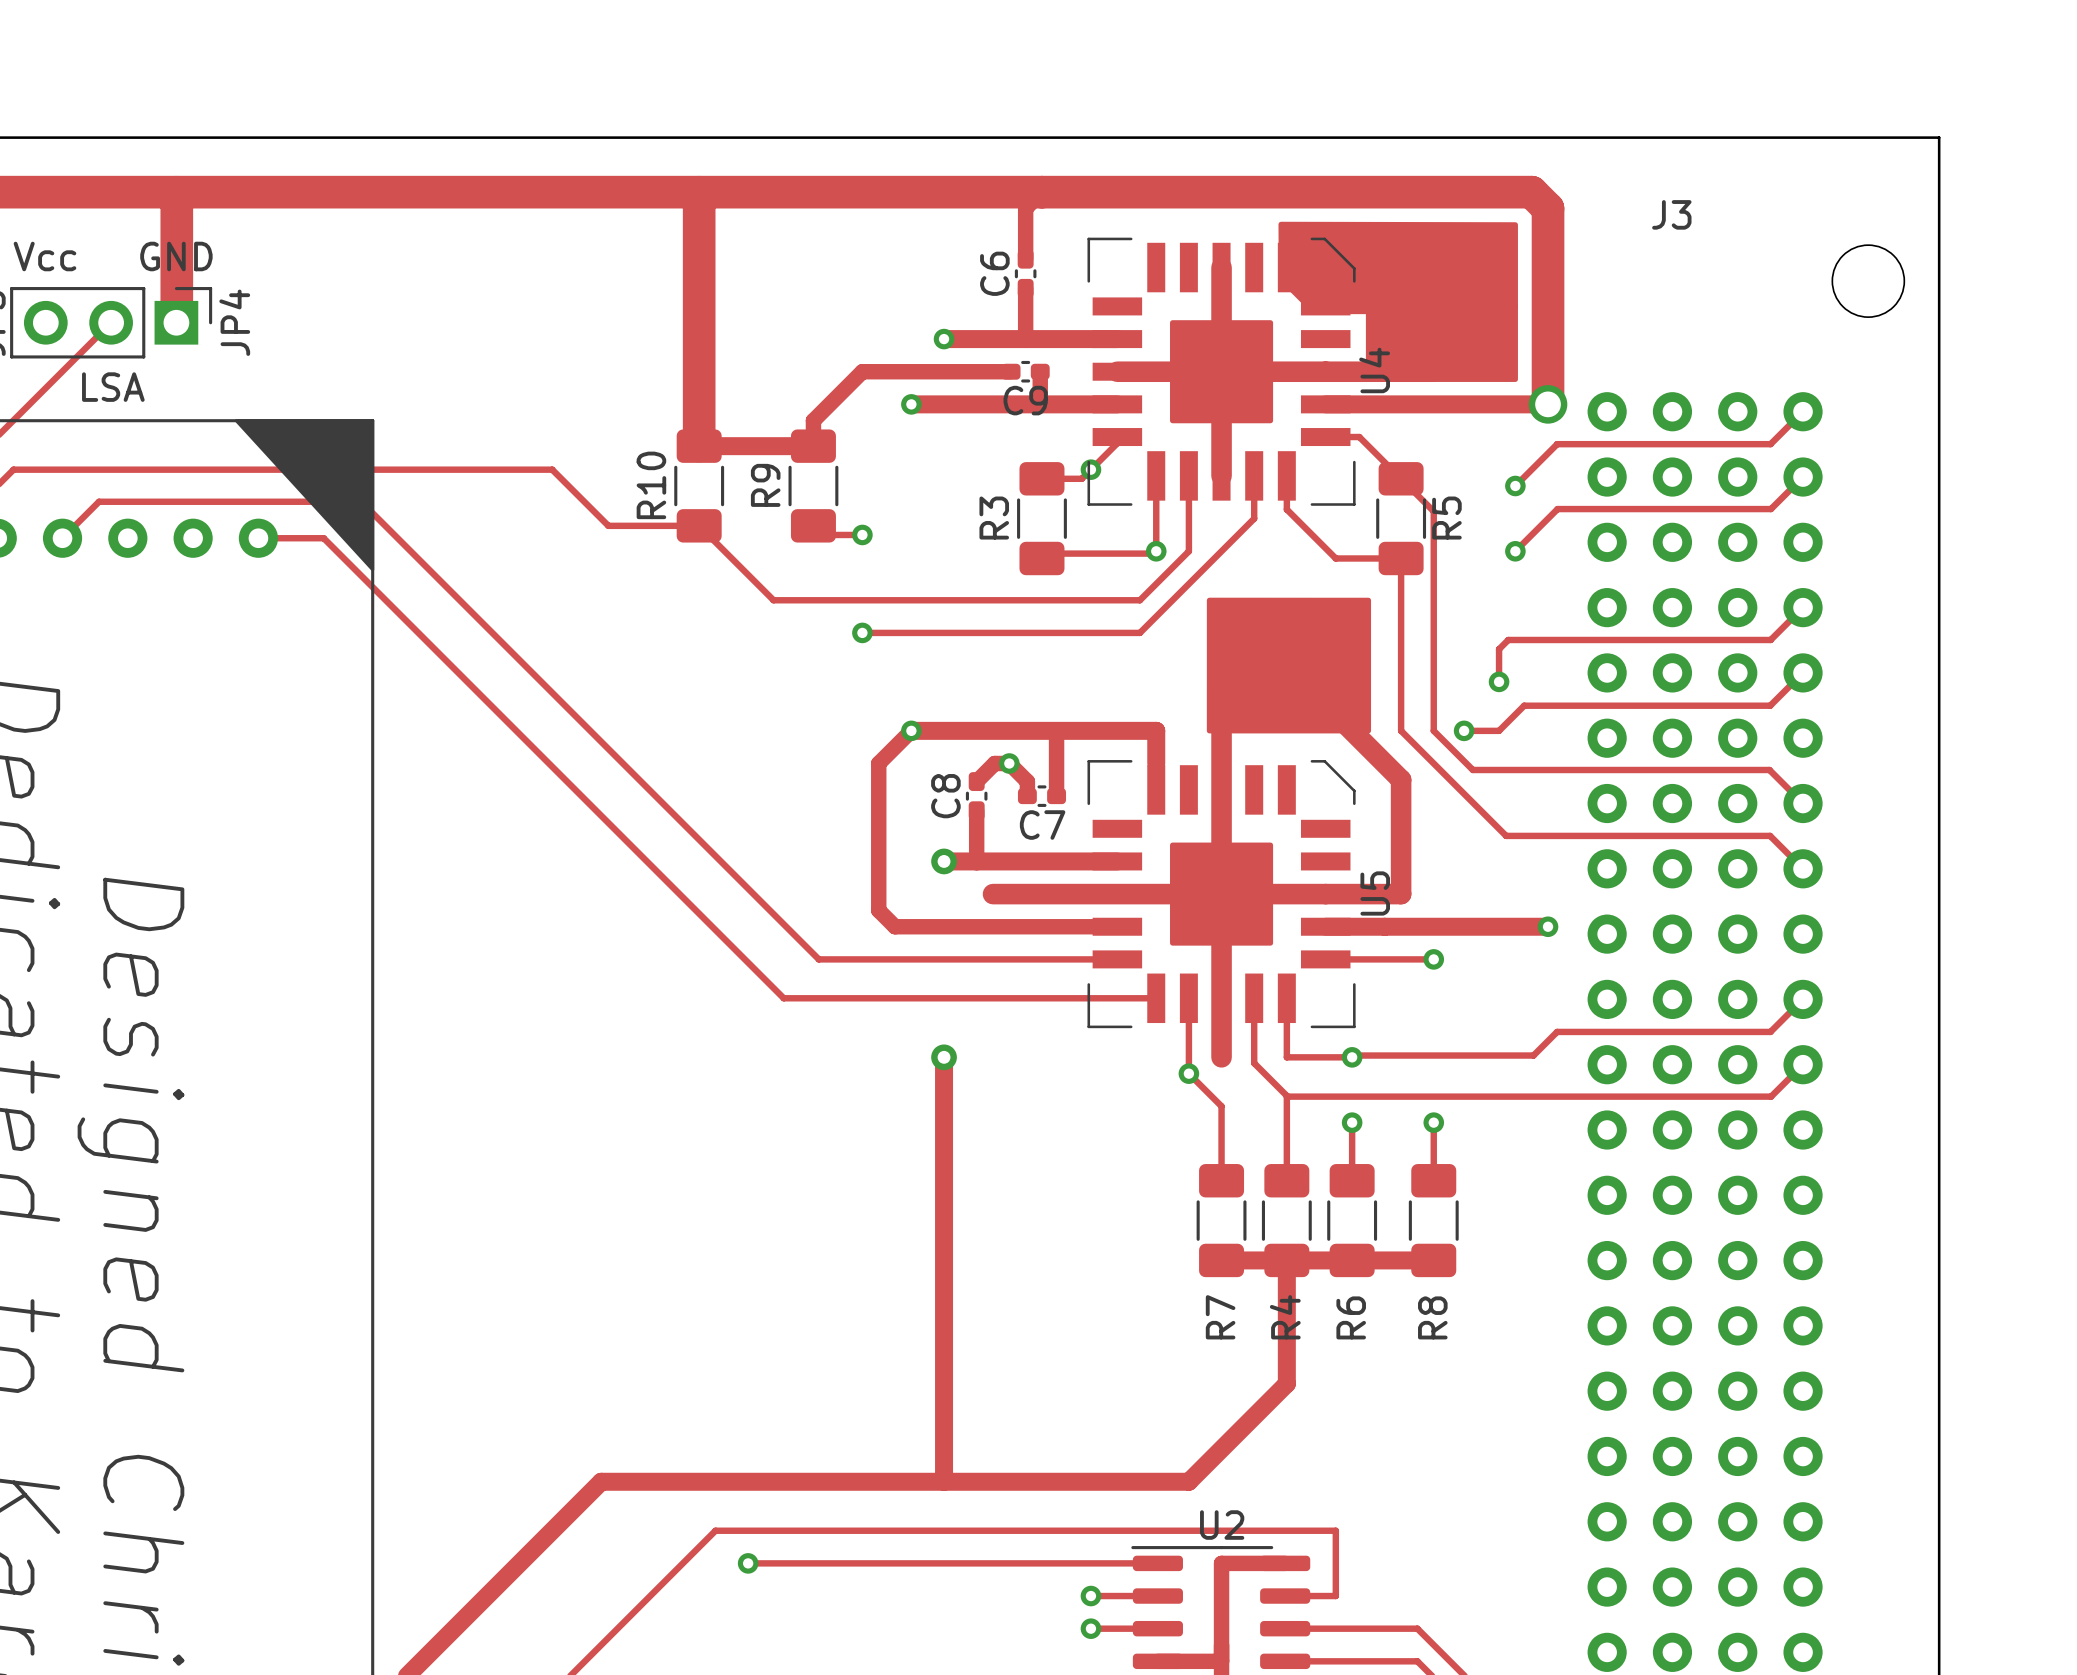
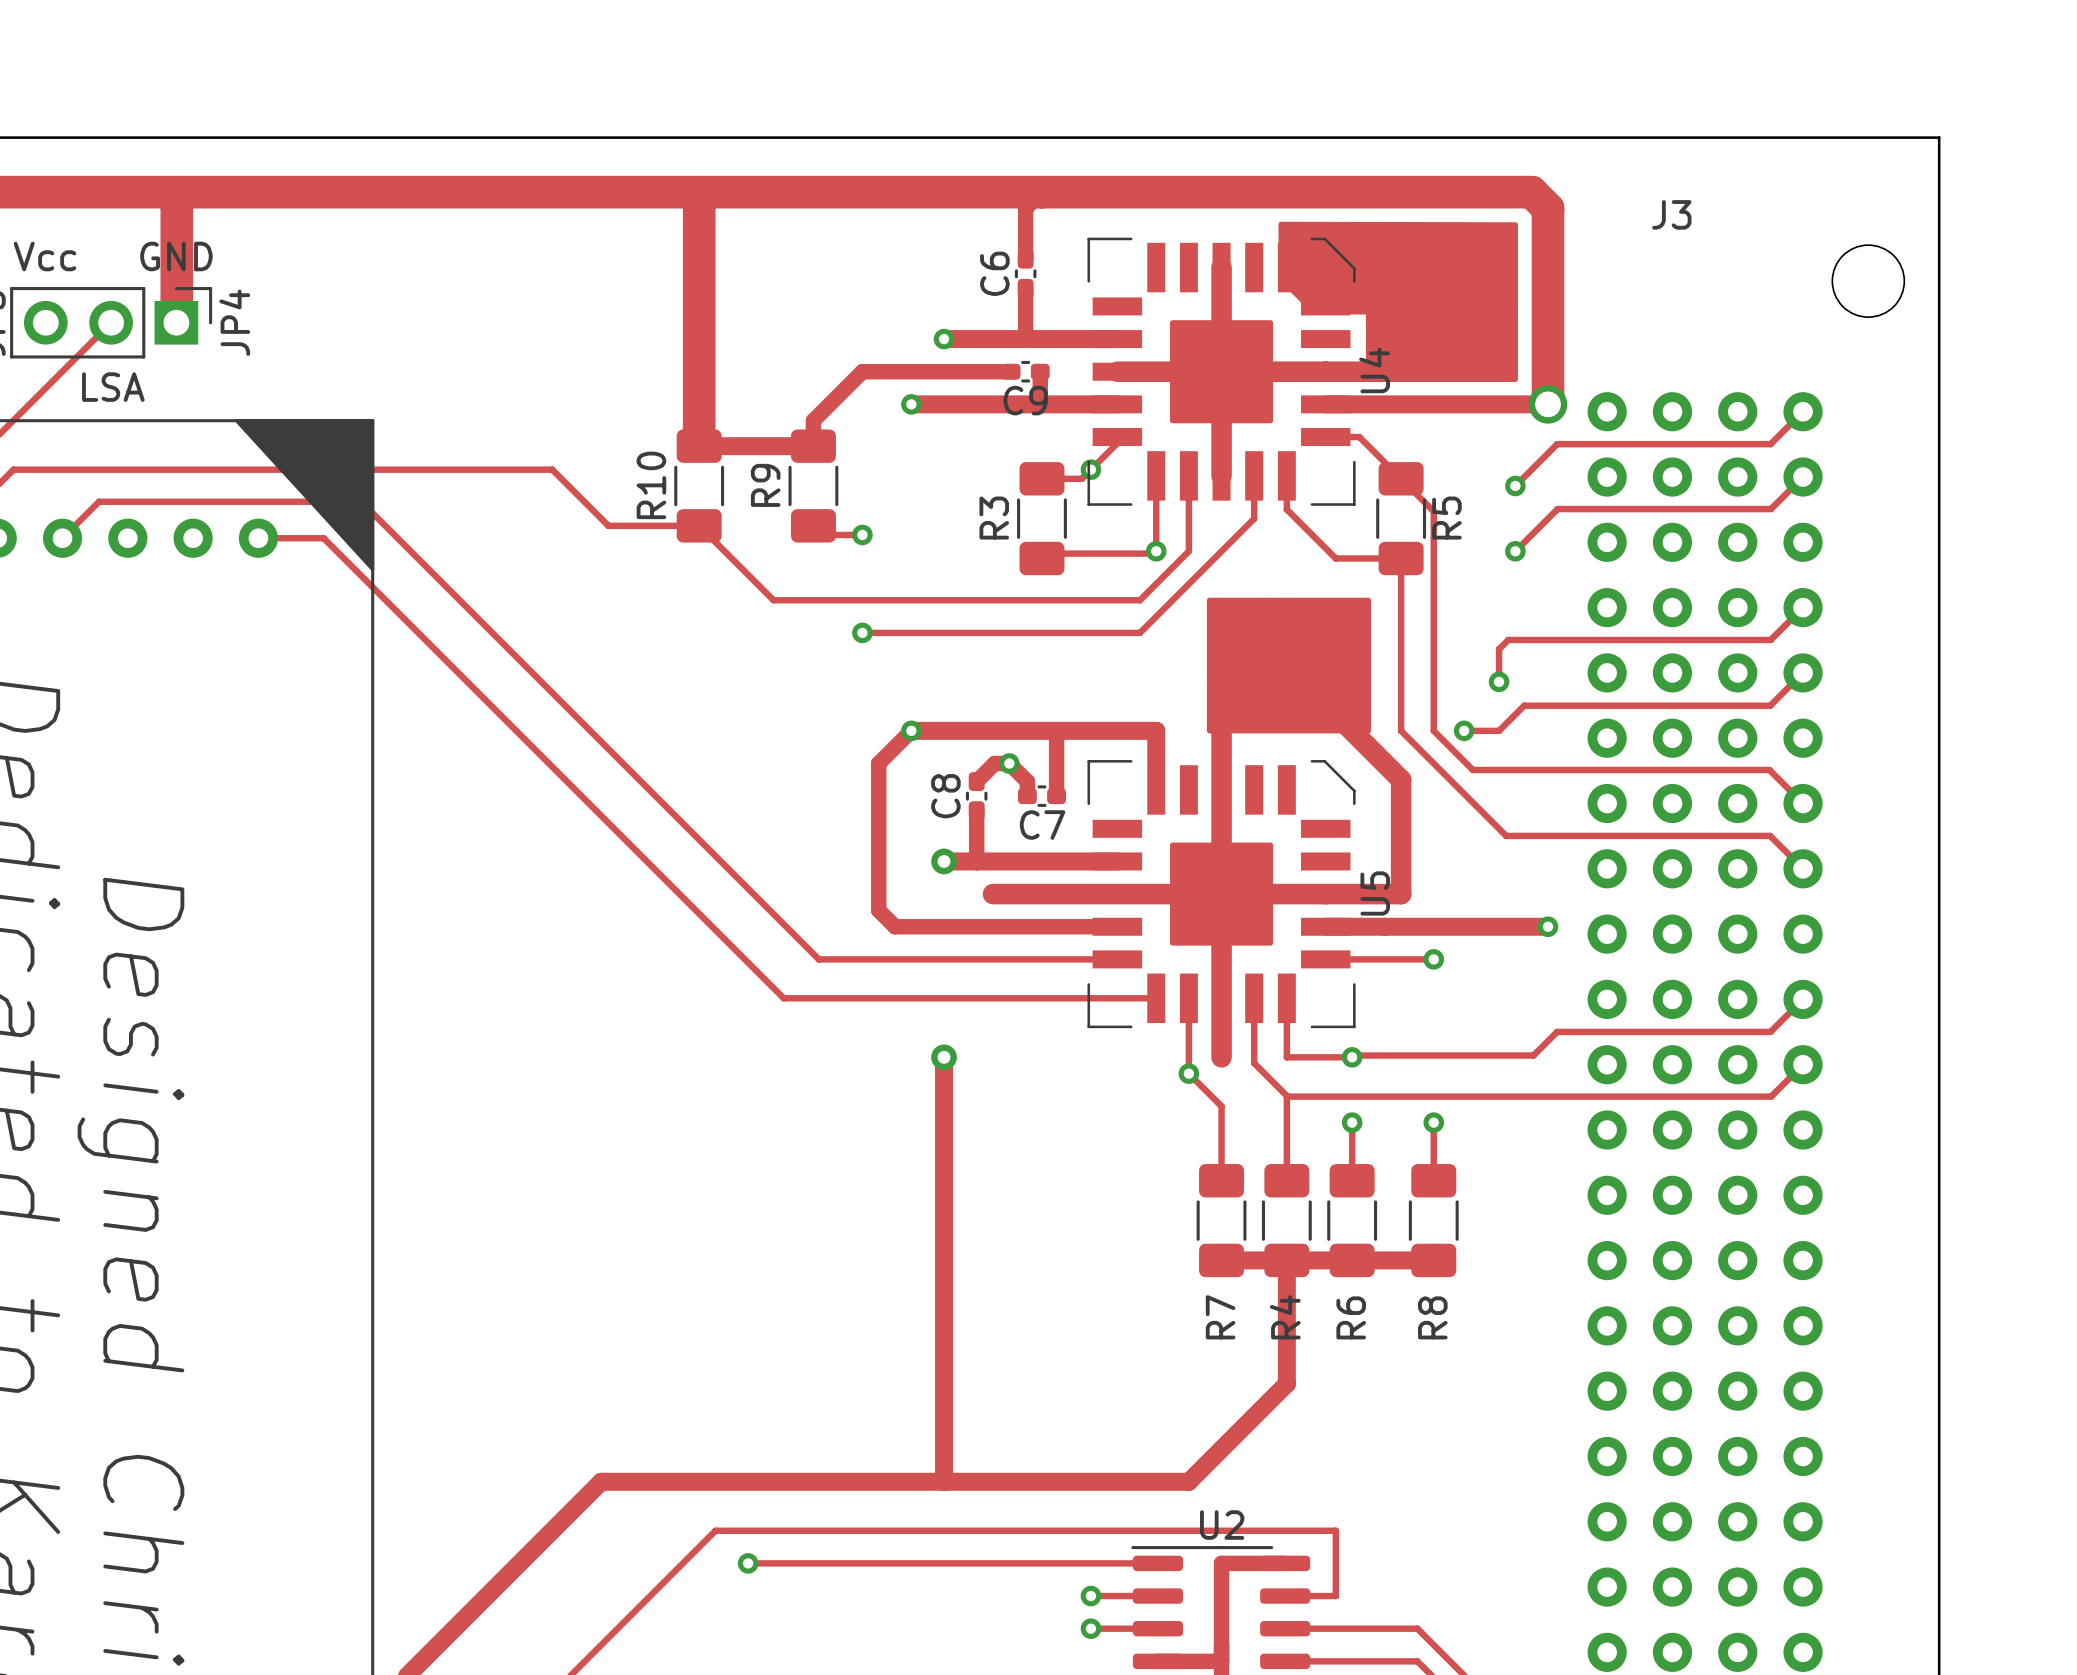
drawing shape: [1278, 221, 1518, 315] -> [1278, 221, 1518, 315]

